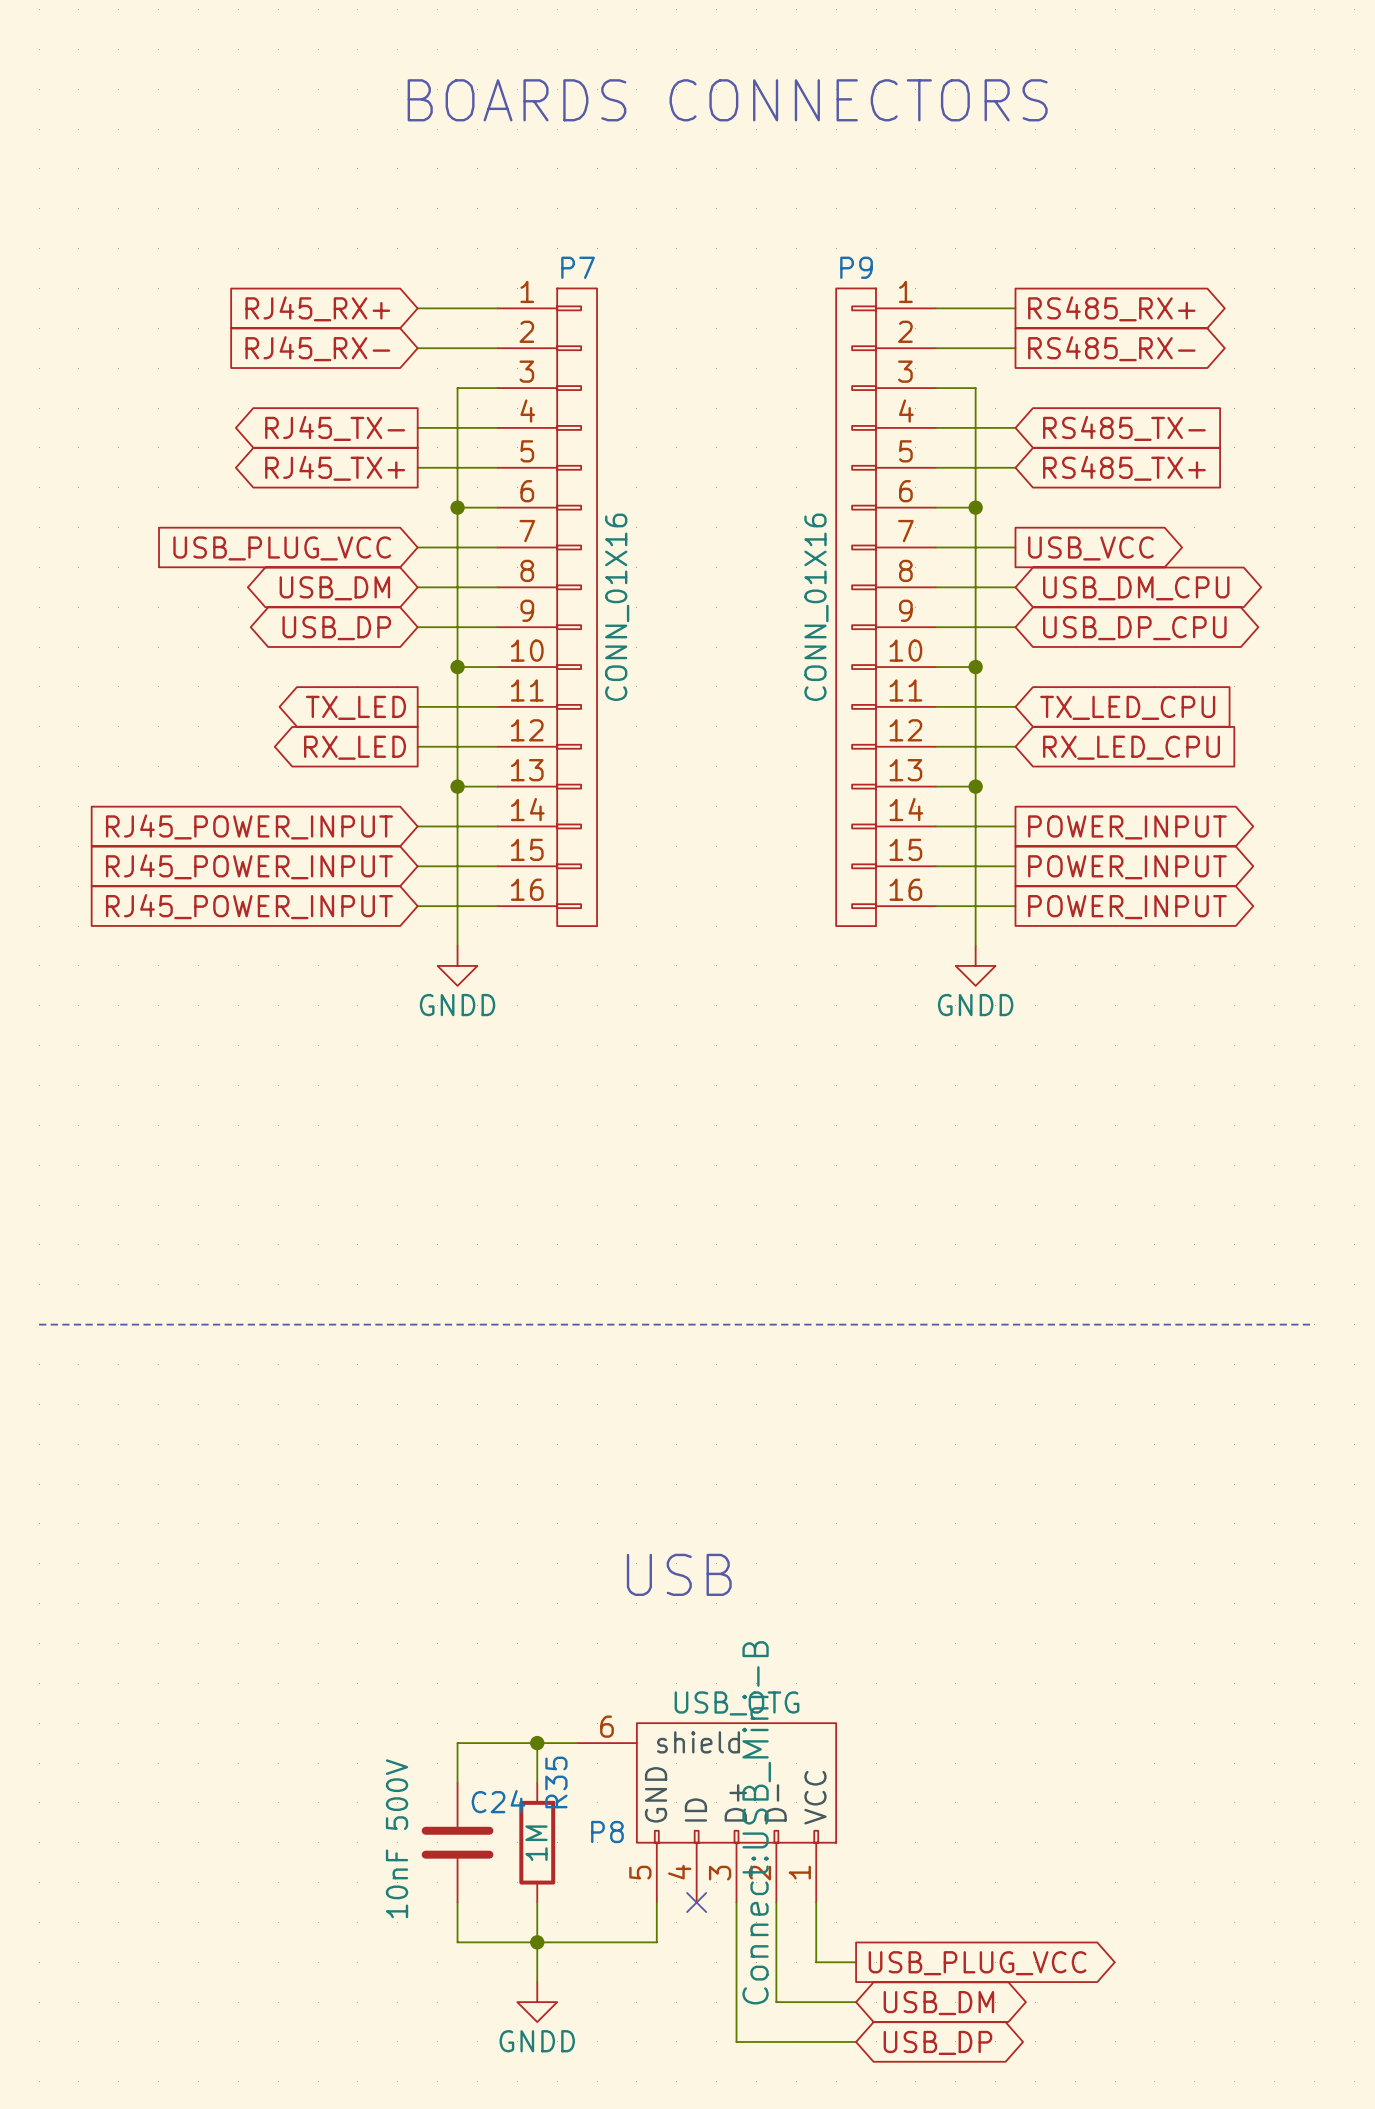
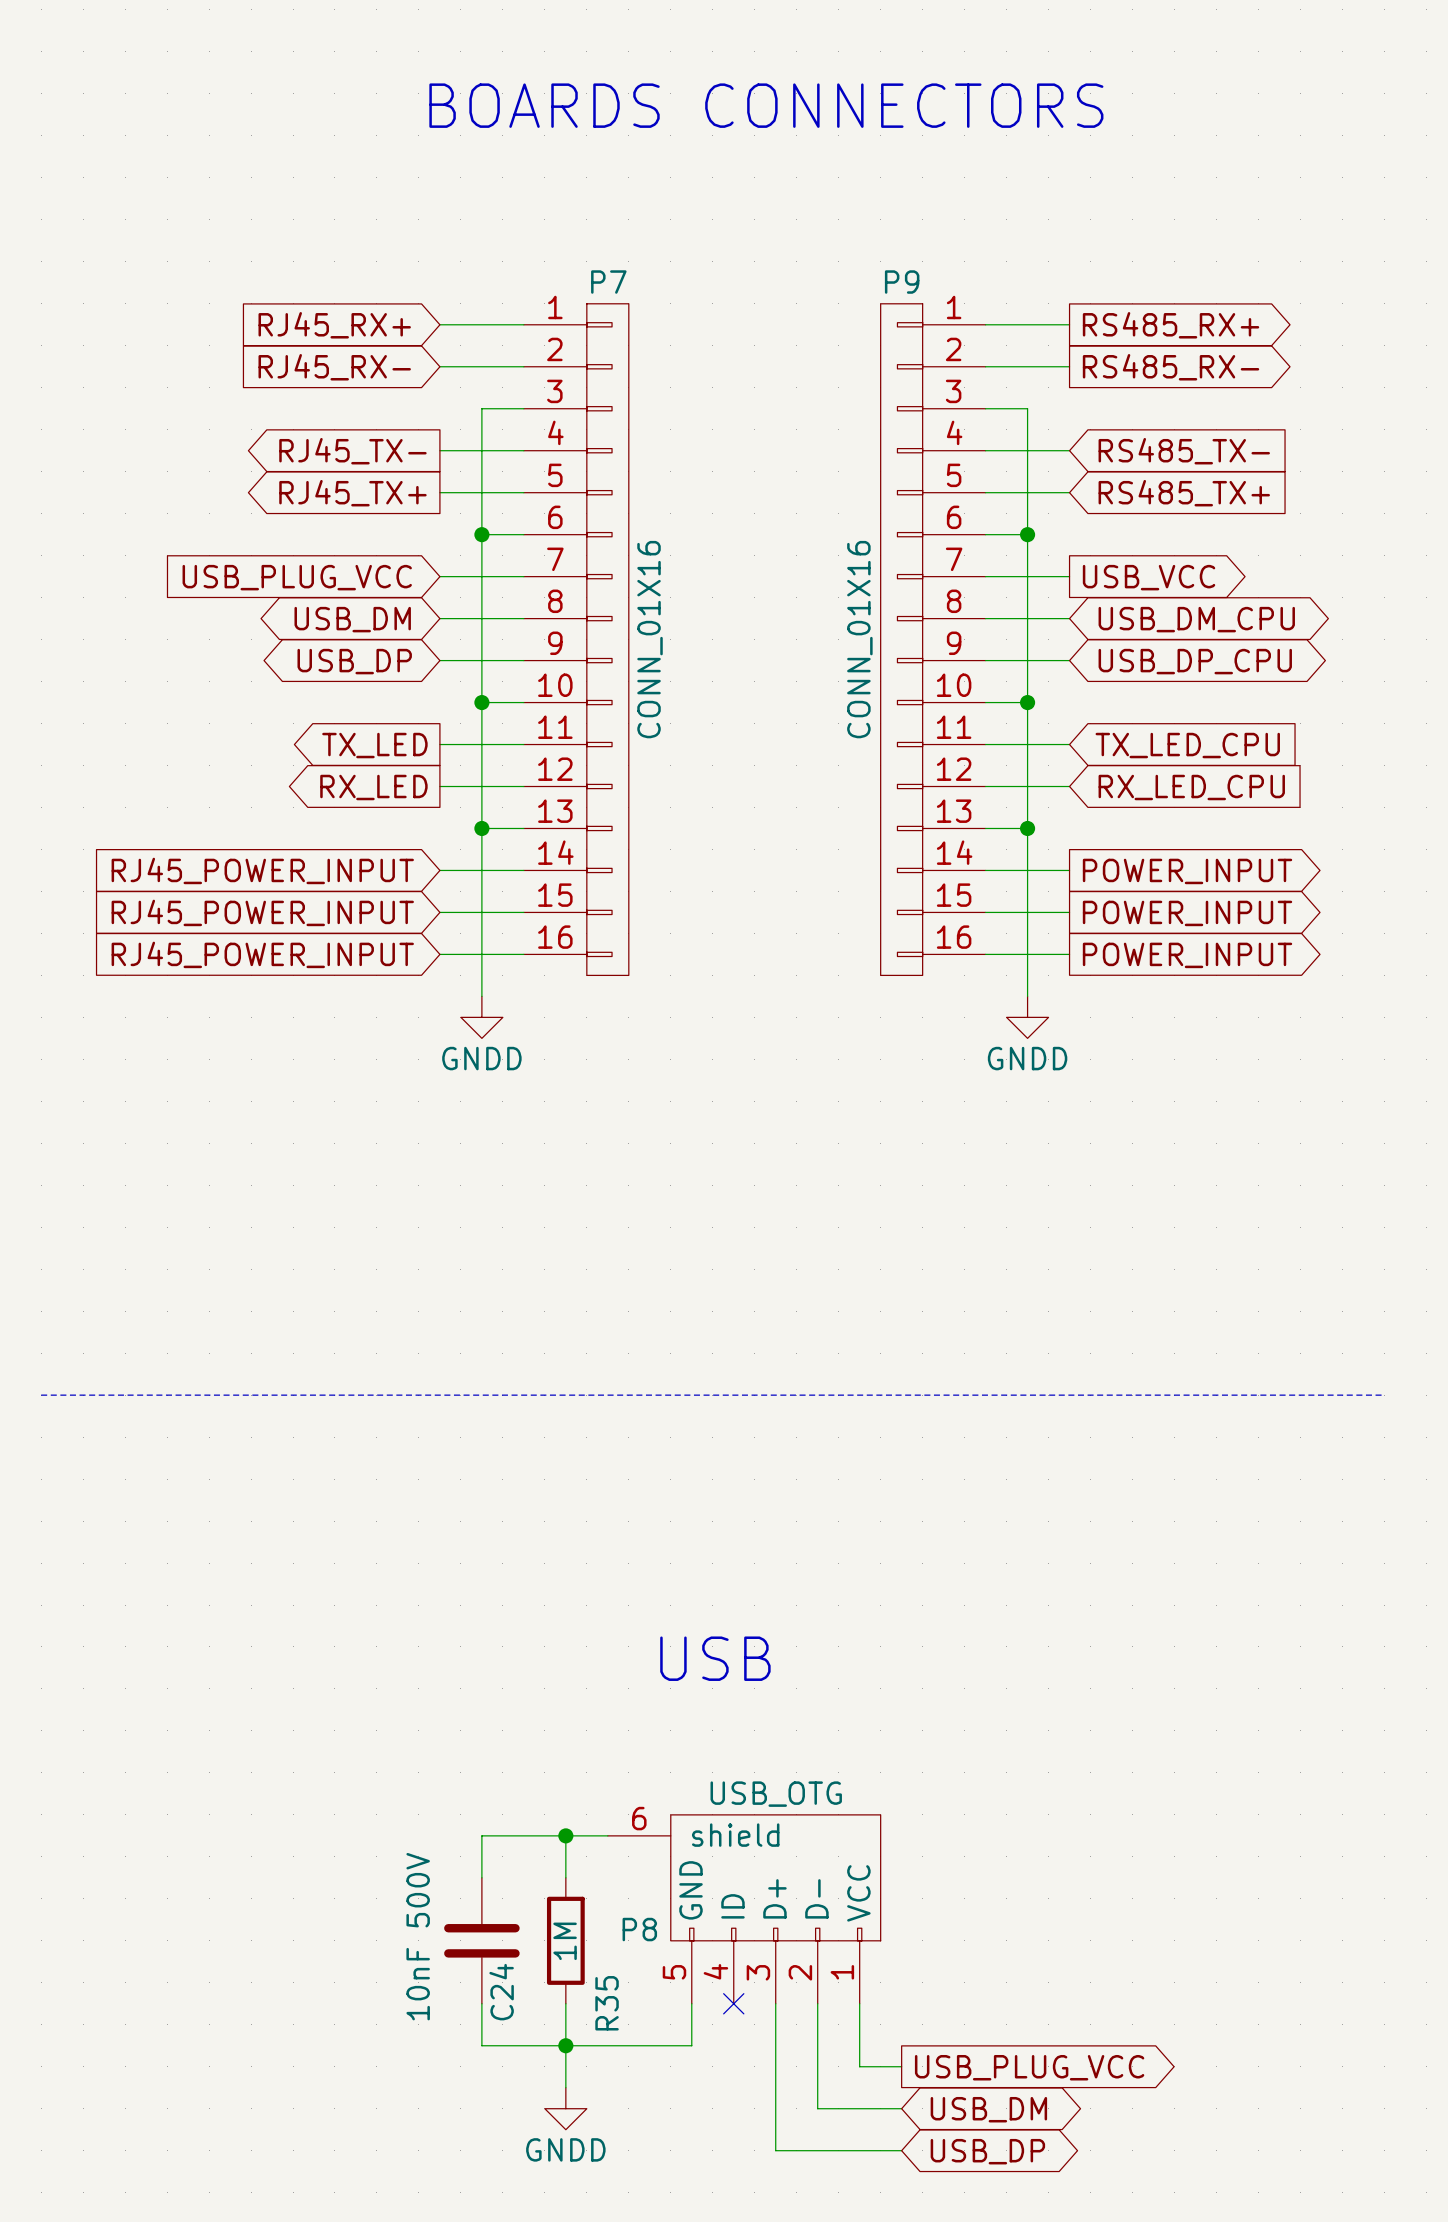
R35 name position: R35 (556, 1782) -> R35 (607, 2003)
C24 name rotation: 0° (498, 1801) -> 90° counterclockwise (501, 1992)
C24 name position: C24 (498, 1801) -> C24 (501, 1992)
P8 text: Connect:USB_Mini-B (756, 1822) -> none

